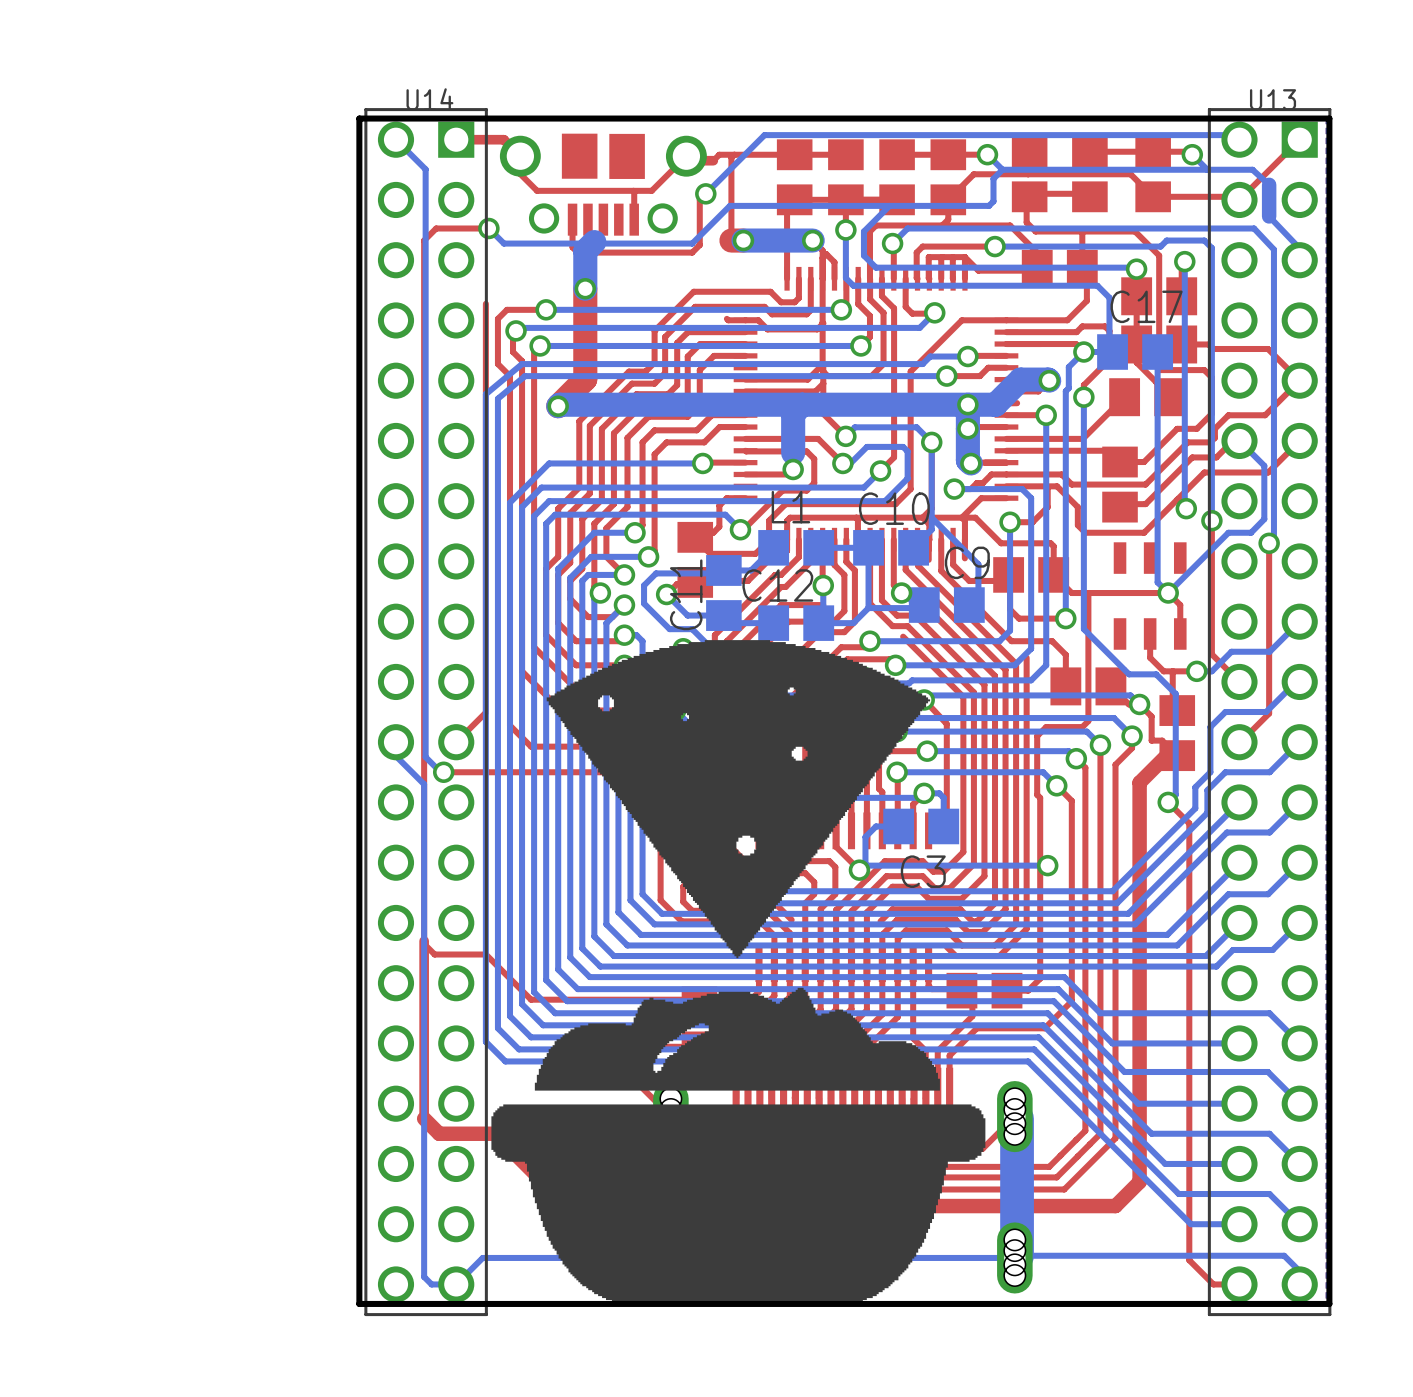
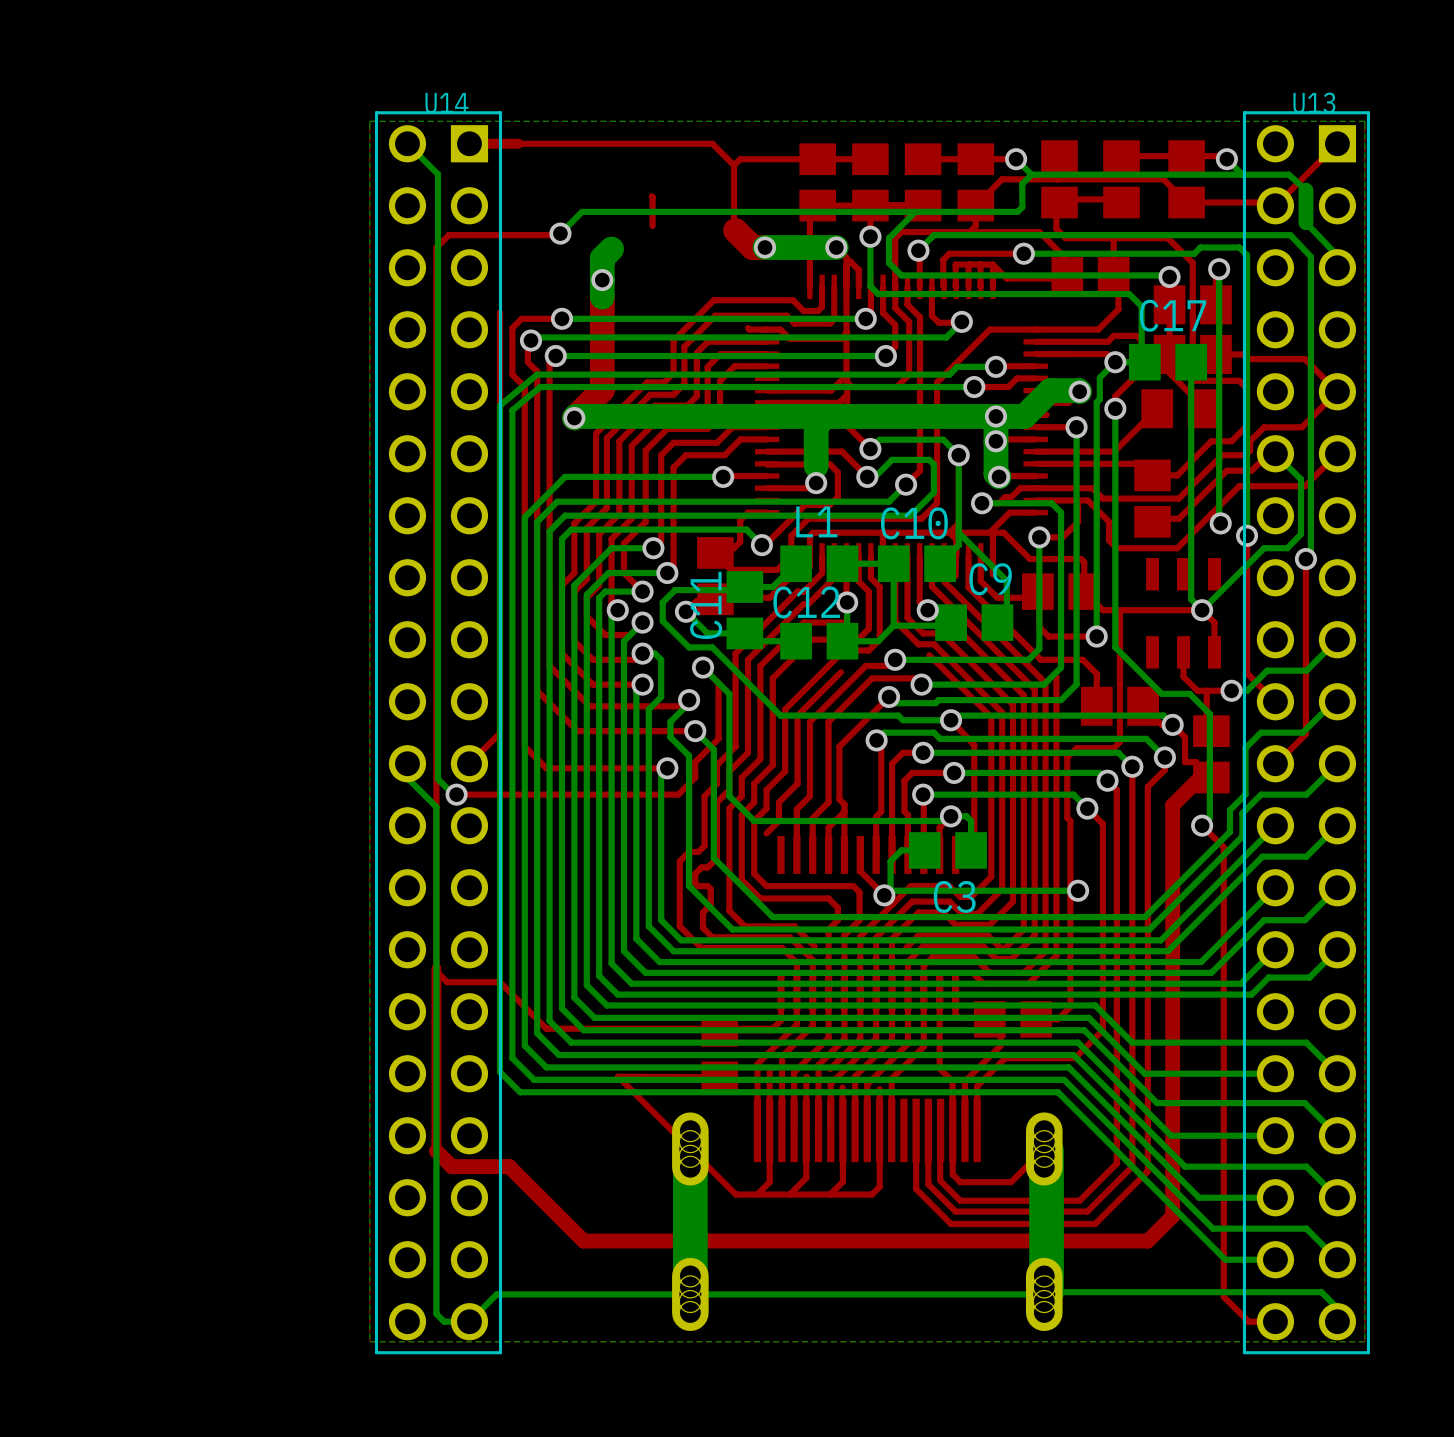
board edge: (1329, 118) (359, 118) (359, 1303) (1329, 1303) (1329, 118) -> none
top track: (503, 139) (520, 156) (520, 174) (537, 190) (651, 190) (686, 156) (686, 160) (713, 160) -> (518, 143) (712, 143) (734, 165) (734, 228) (752, 247)
bottom track: (1239, 139) (1234, 135) (764, 135) (705, 193) -> none
top track: (734, 154) (731, 157) (731, 240) -> none
part: (603, 184) -> none
top track: (705, 193) (699, 199) (699, 245) (692, 252) (577, 252) (572, 247) (572, 219) -> none
via: (705, 193) -> none
bottom track: (729, 205) (692, 243) (503, 243) (488, 228) -> (751, 211) (582, 211) (560, 233)
top track: none -> (560, 233) (558, 235) (503, 235)
via: none -> (560, 233)
via: (488, 228) -> none
via position: (585, 288) -> (602, 280)
drawing: [491, 640, 986, 1306] -> none

